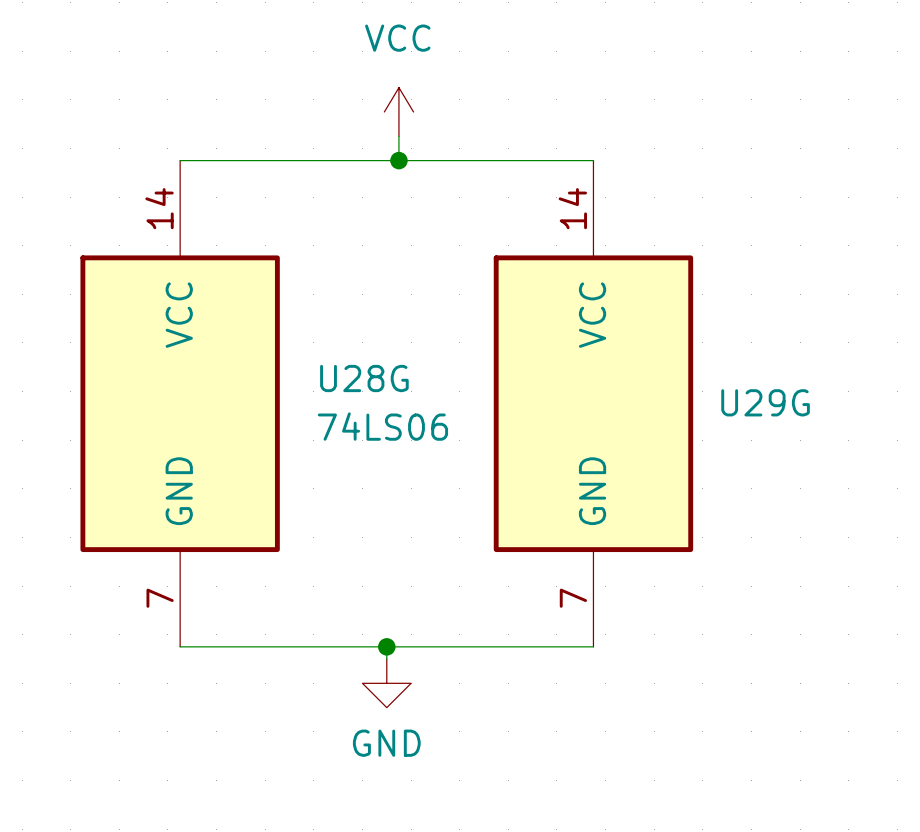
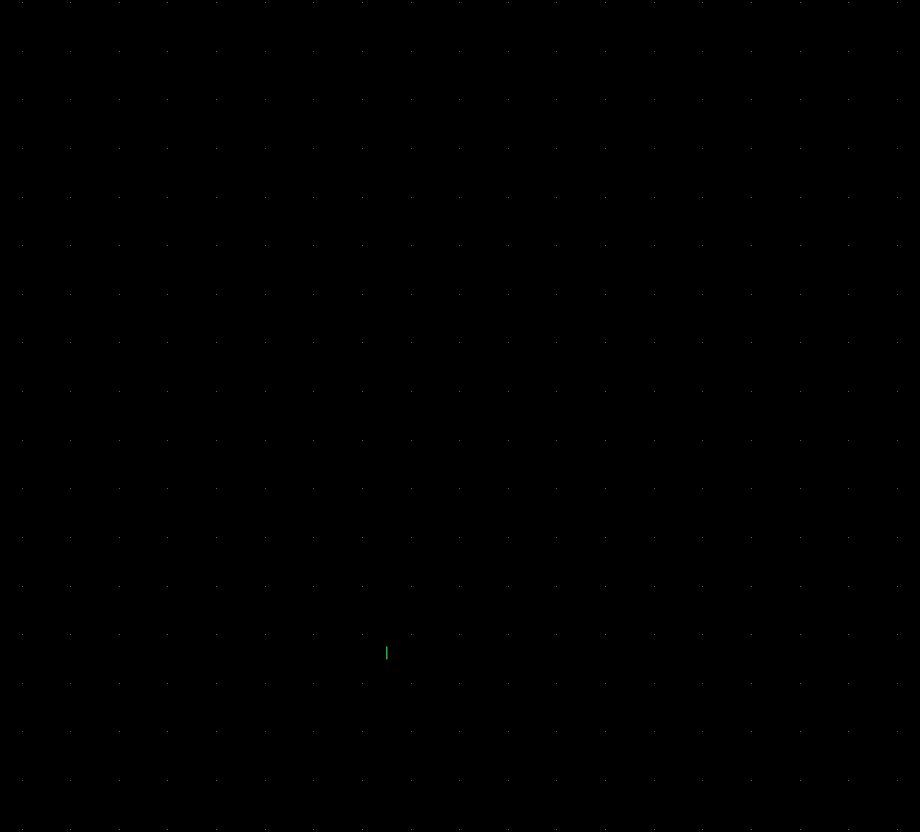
power symbol: VCC (398, 111) -> none
wire: (398, 136) (398, 160) -> none
wire: (180, 160) (593, 160) -> none
junction: (398, 160) -> none
U28G: 74LS06 (180, 403) -> none
U29G: (593, 403) -> none
wire: (180, 646) (593, 646) -> none
junction: (386, 646) -> none
power symbol: GND (386, 683) -> none

